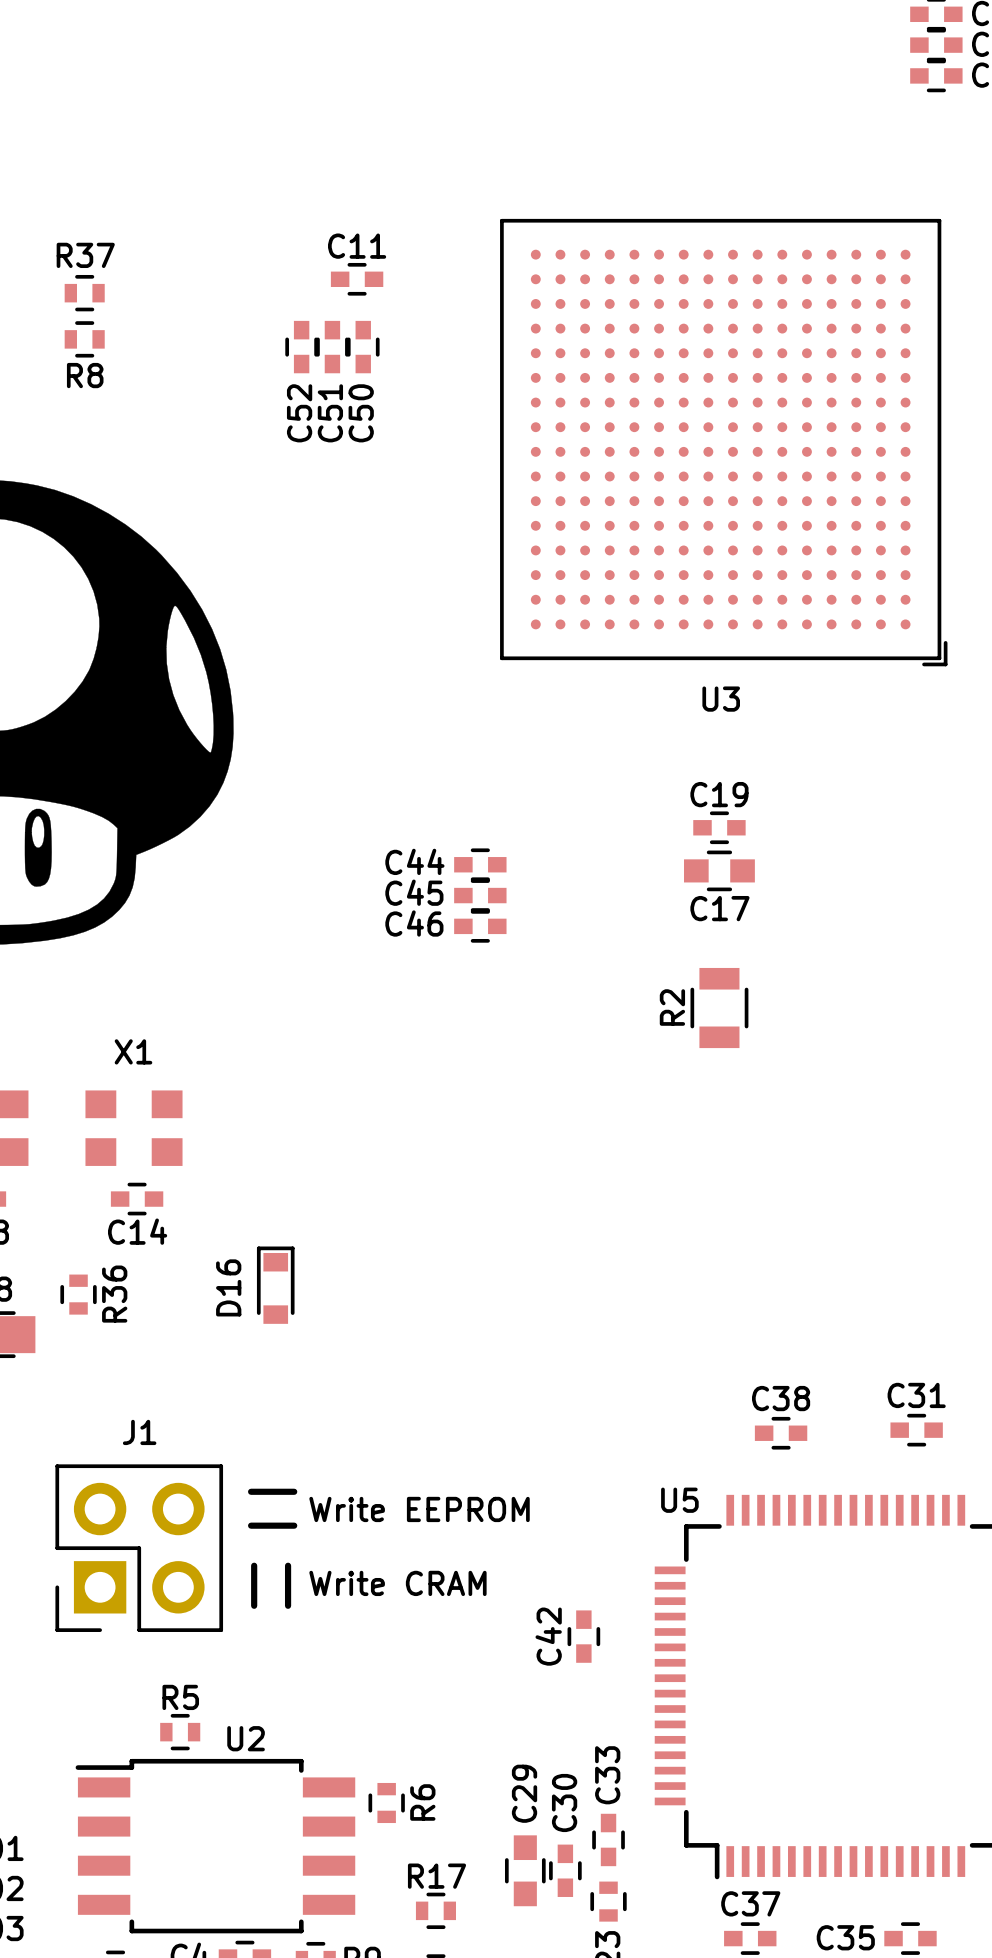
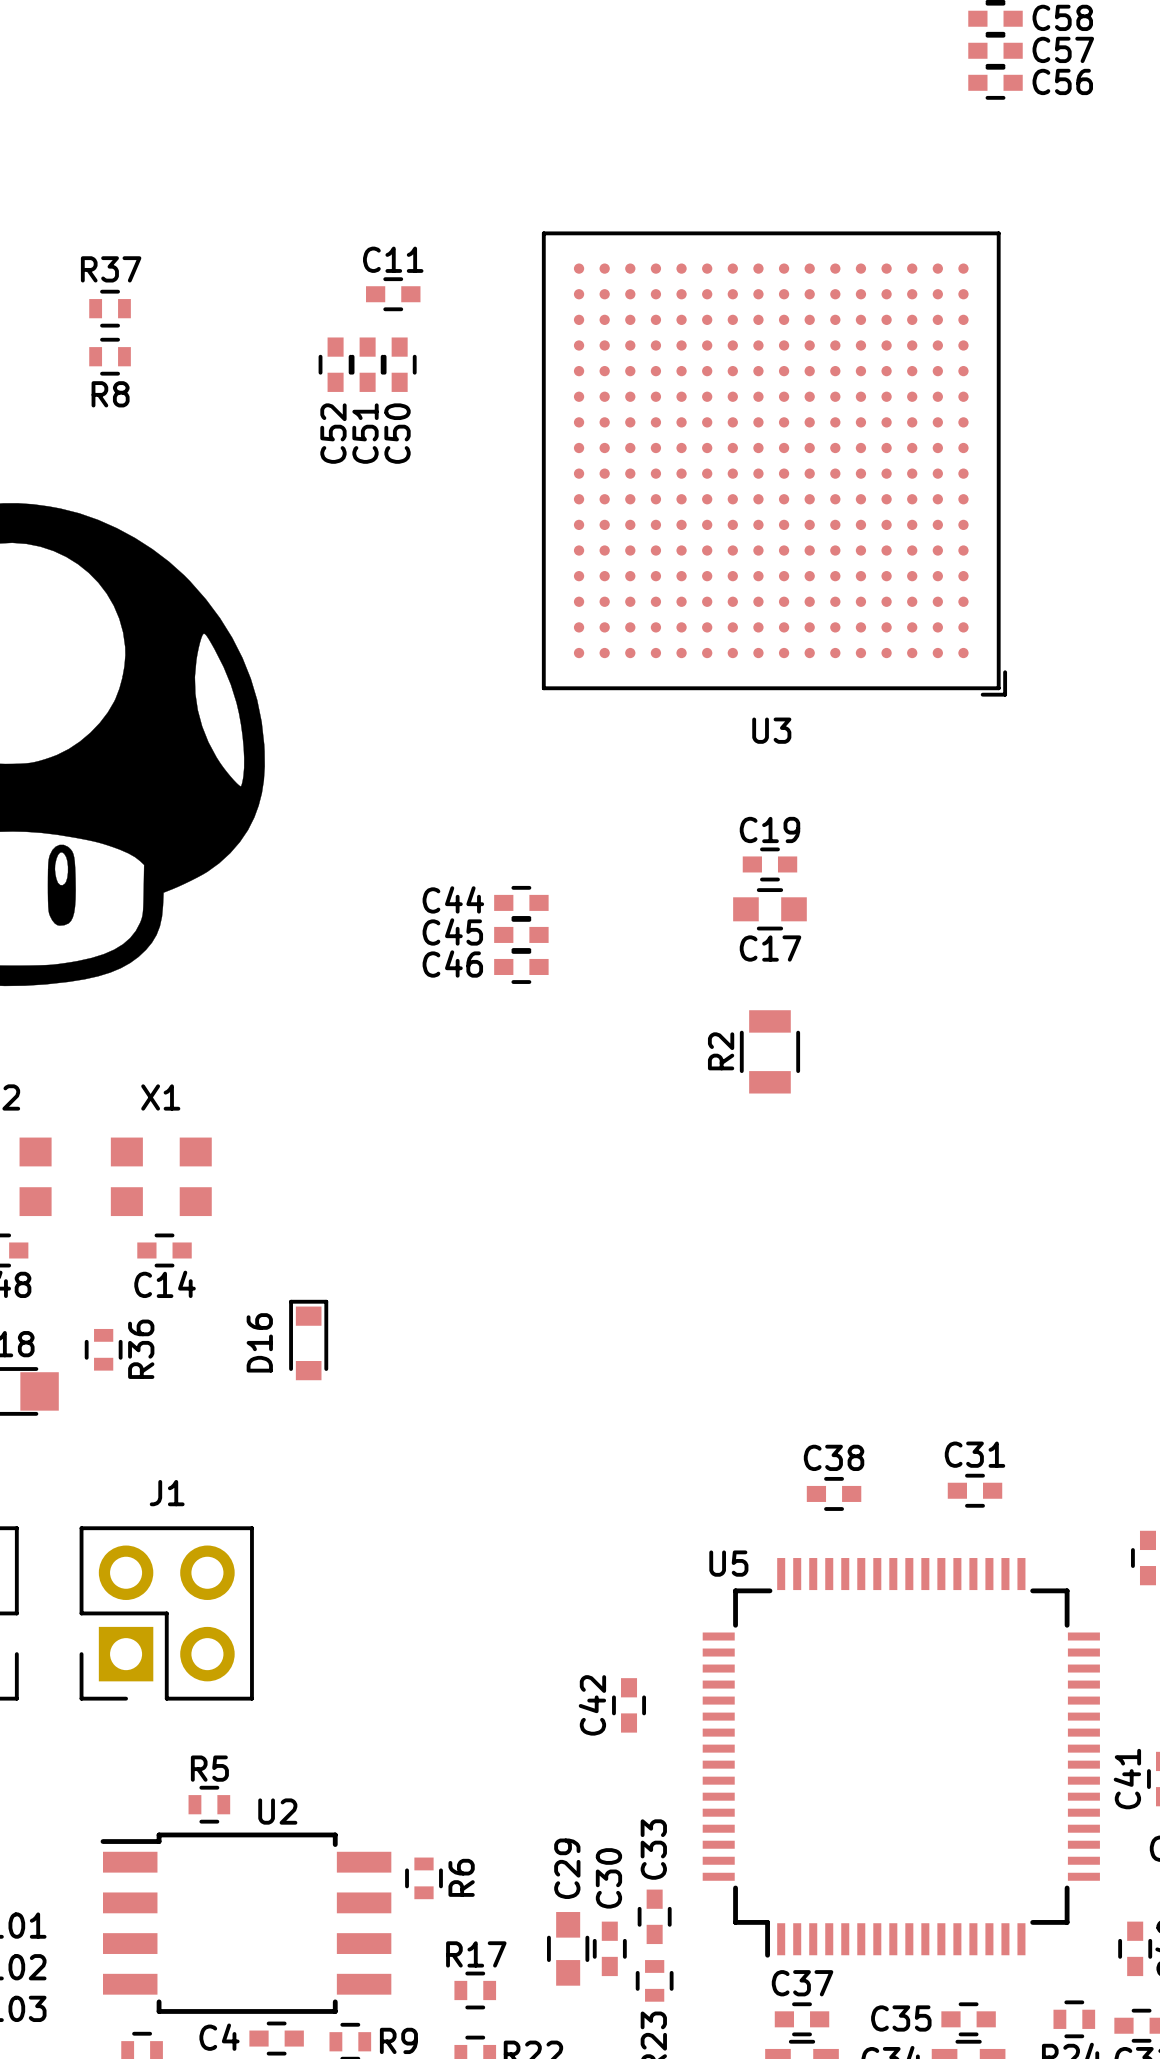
line: (251, 1491) (294, 1491) -> none
text: Write EEPROM (419, 1509) -> none
line: (251, 1525) (294, 1525) -> none
line: (254, 1565) (254, 1605) -> none
line: (288, 1565) (288, 1605) -> none
text: Write CRAM (397, 1583) -> none

